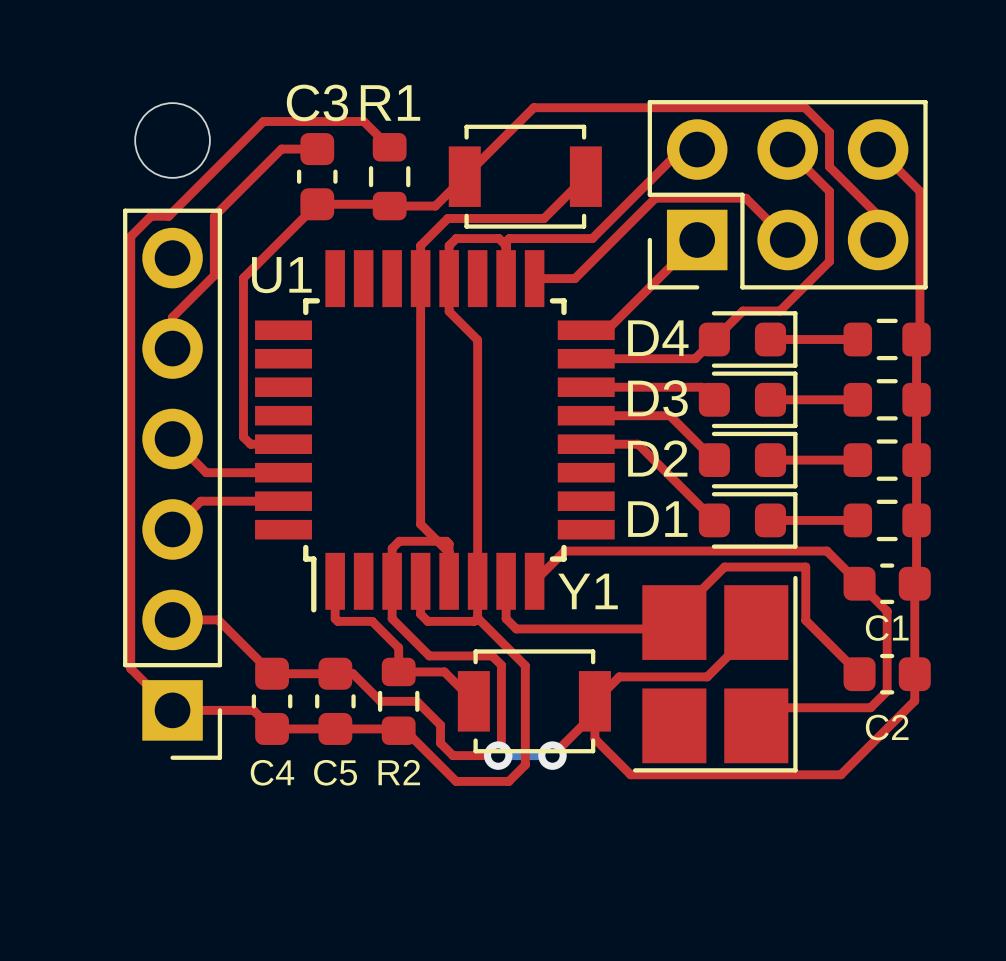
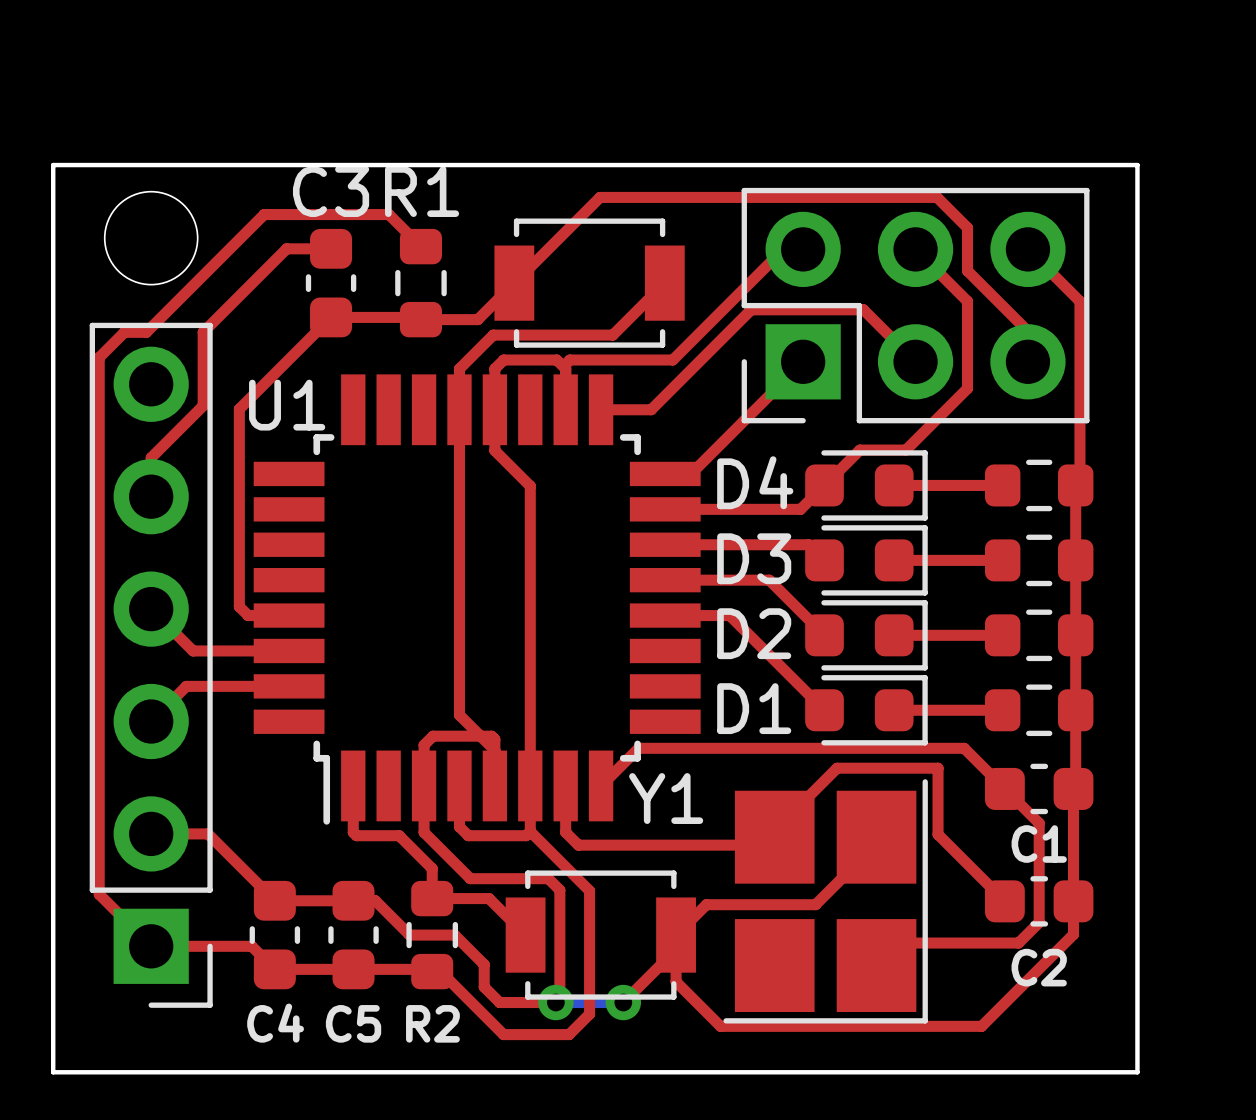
board edge: none -> (53, 165) (1137, 165) (1137, 1072) (53, 1072) (53, 165)

